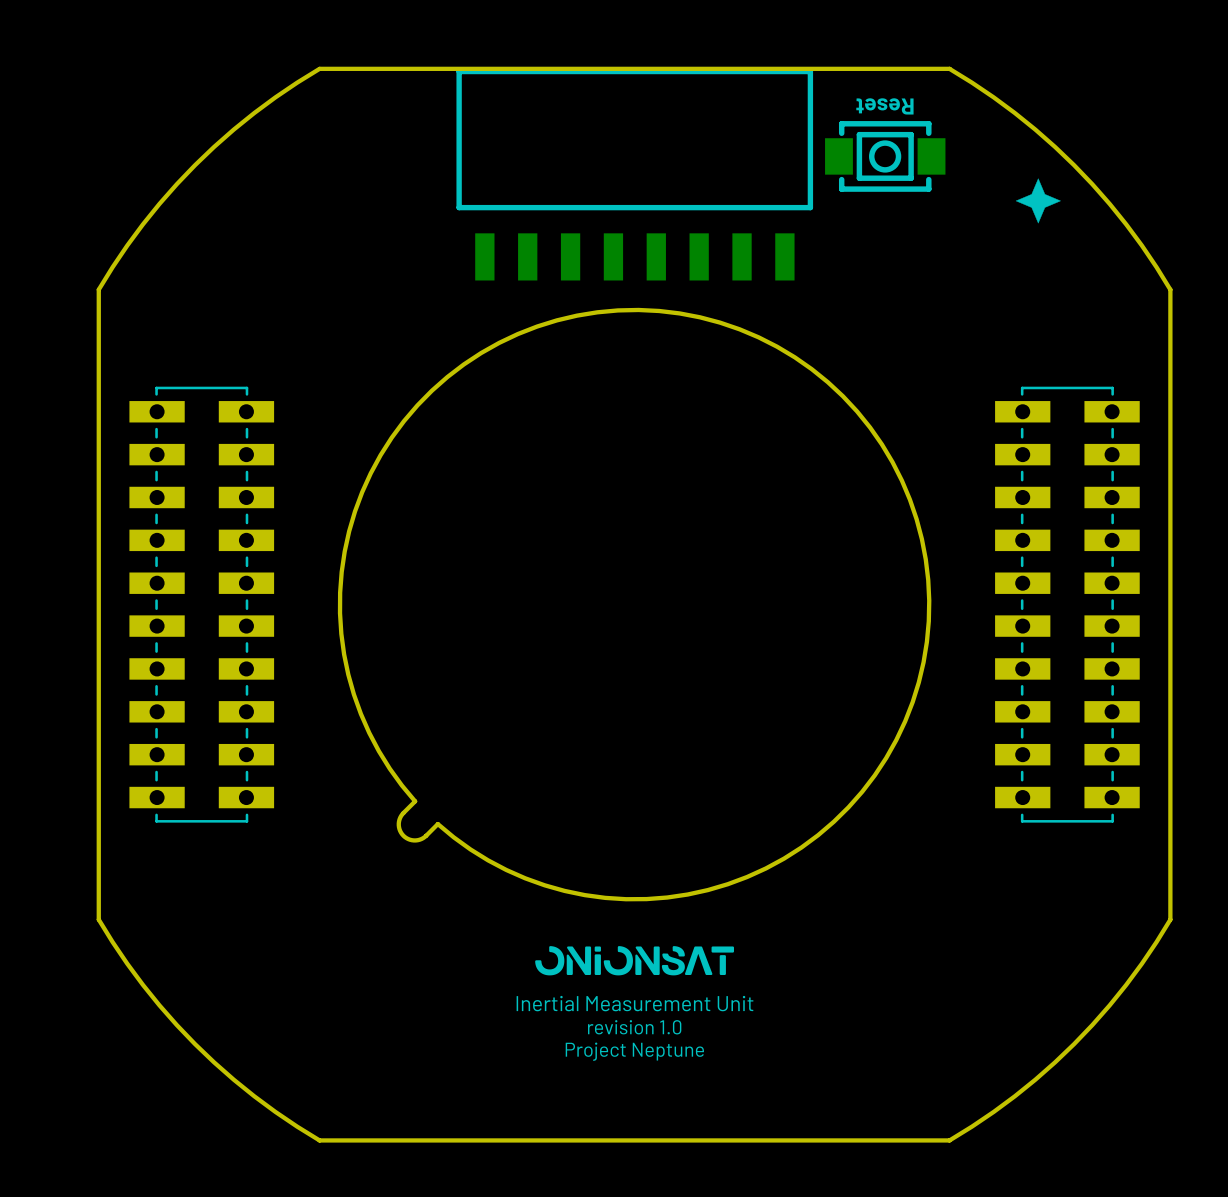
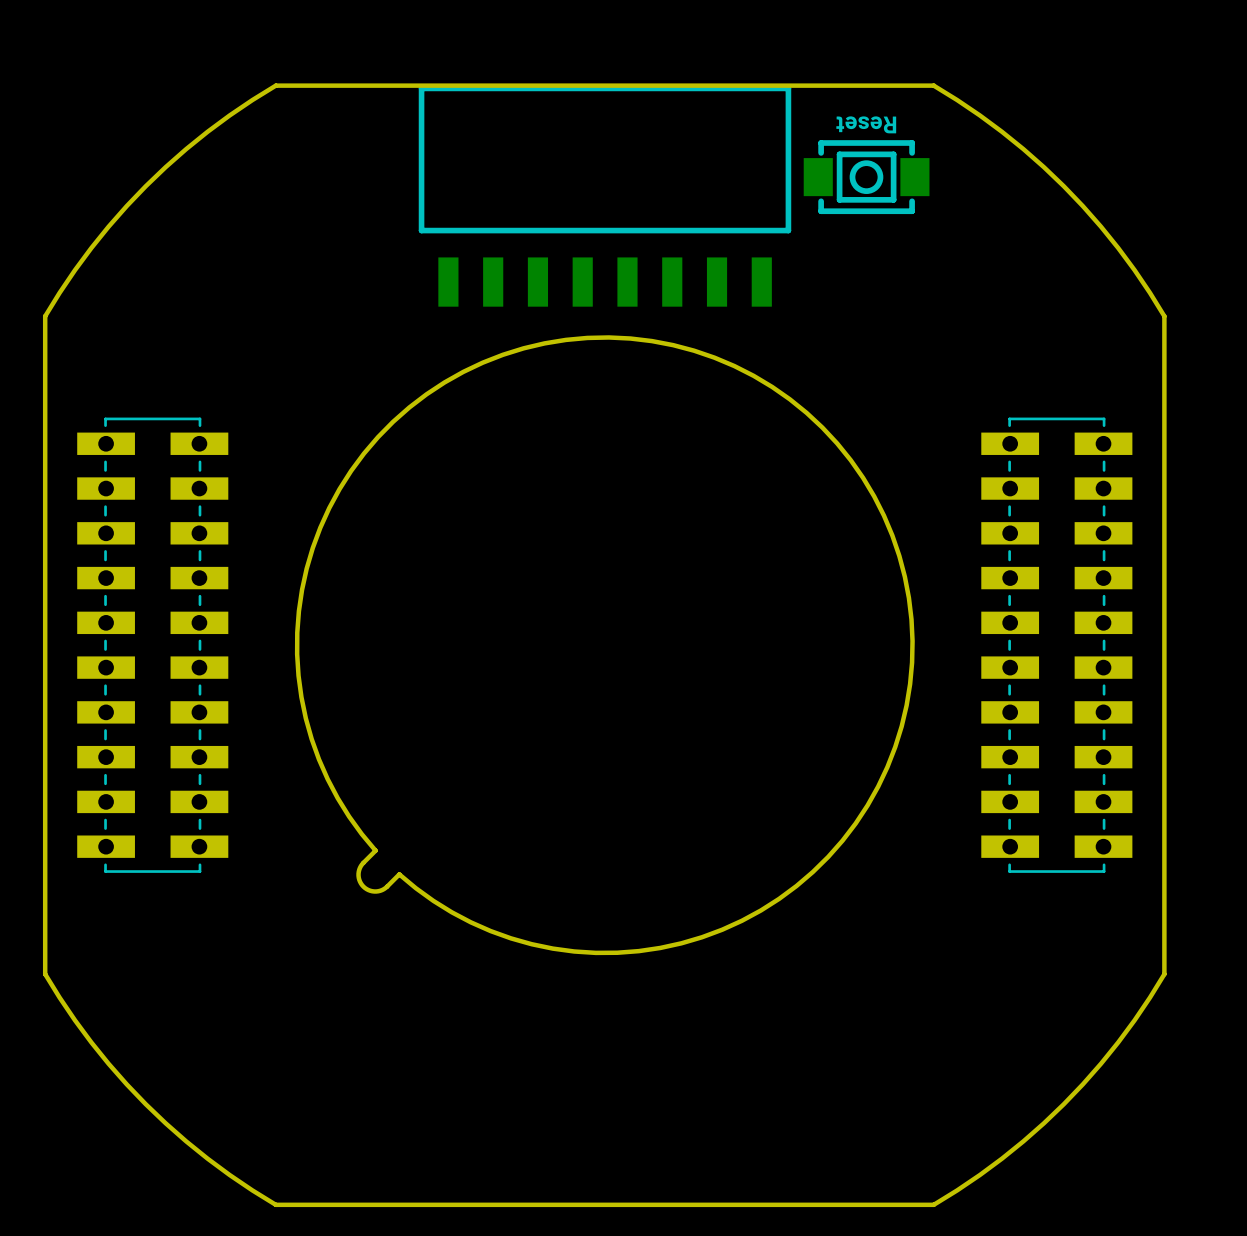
drawing: [1015, 178, 1061, 224] -> none
drawing: [535, 946, 735, 976] -> none
text: Inertial Measurement Unit (634, 1003) -> none
text: revision 1.0 (634, 1027) -> none
text: Project Neptune (634, 1051) -> none

